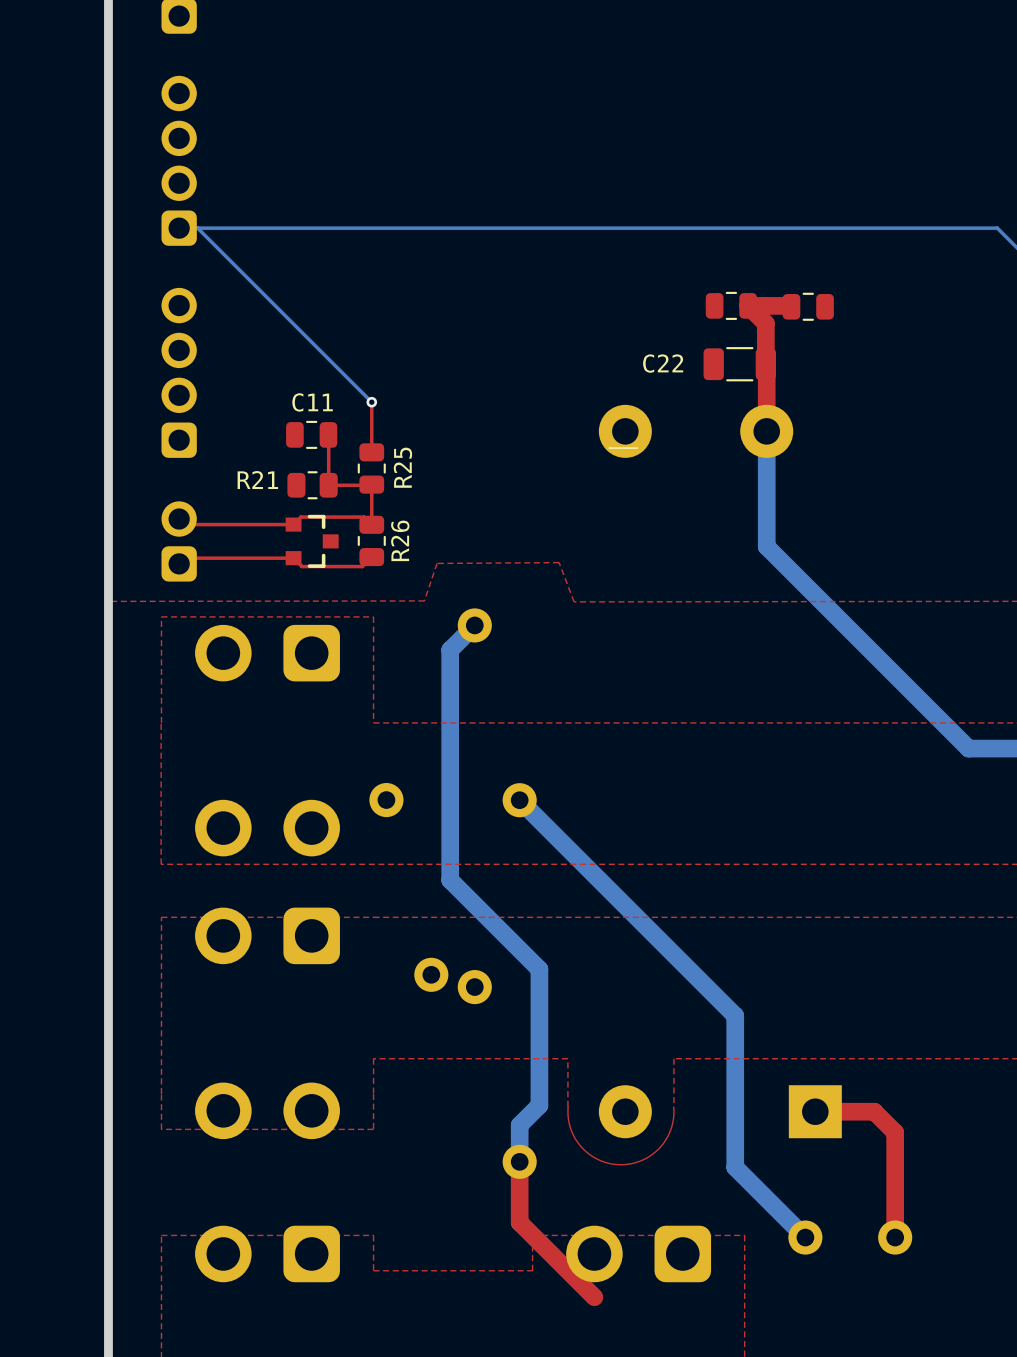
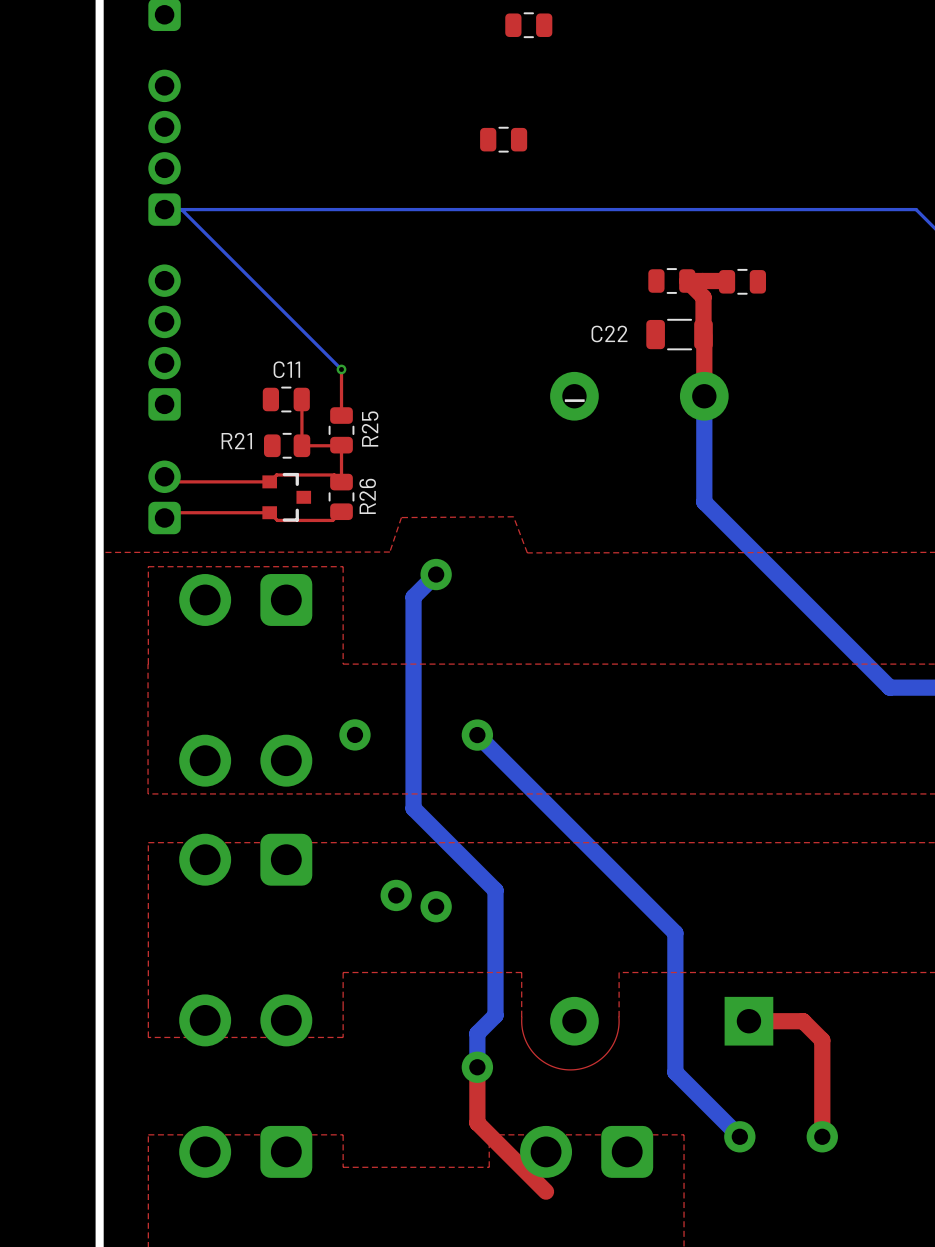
part: none -> (528, 25)
part: none -> (503, 139)

